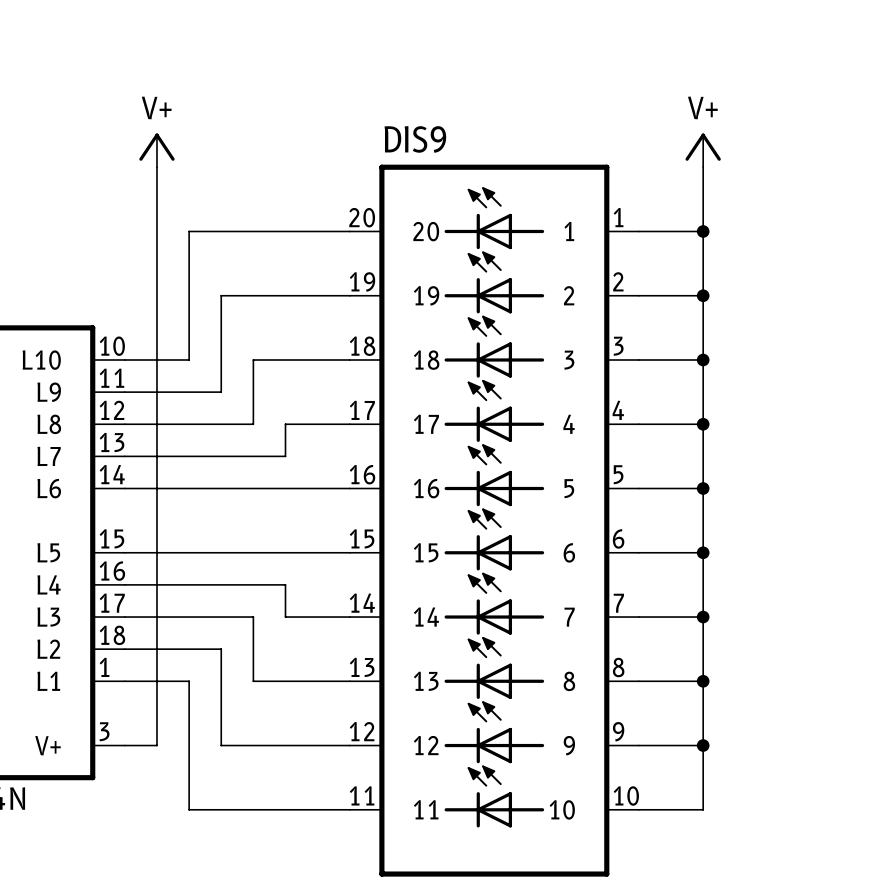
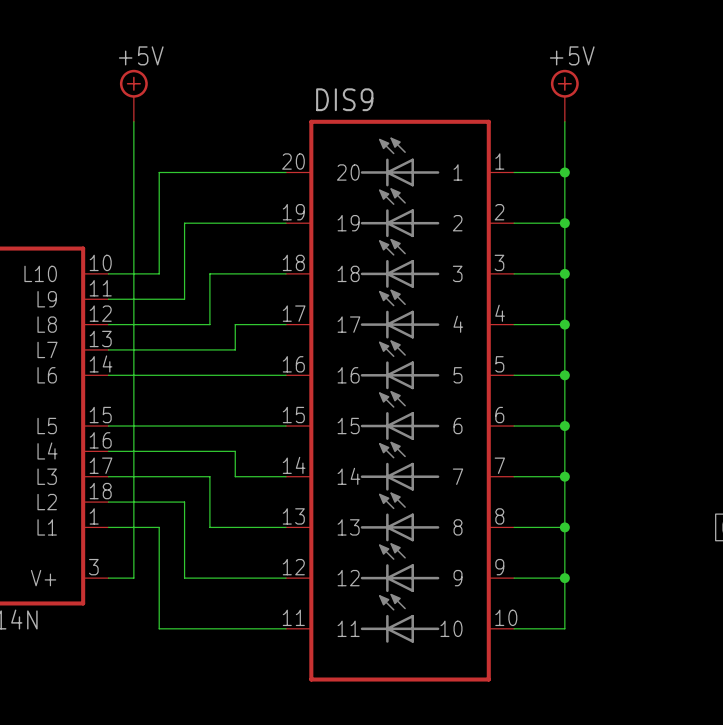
power symbol: none -> +5V (133, 95)
power symbol: none -> +5V (564, 95)
power symbol: V+ (156, 150) -> none
power symbol: V+ (703, 150) -> none

